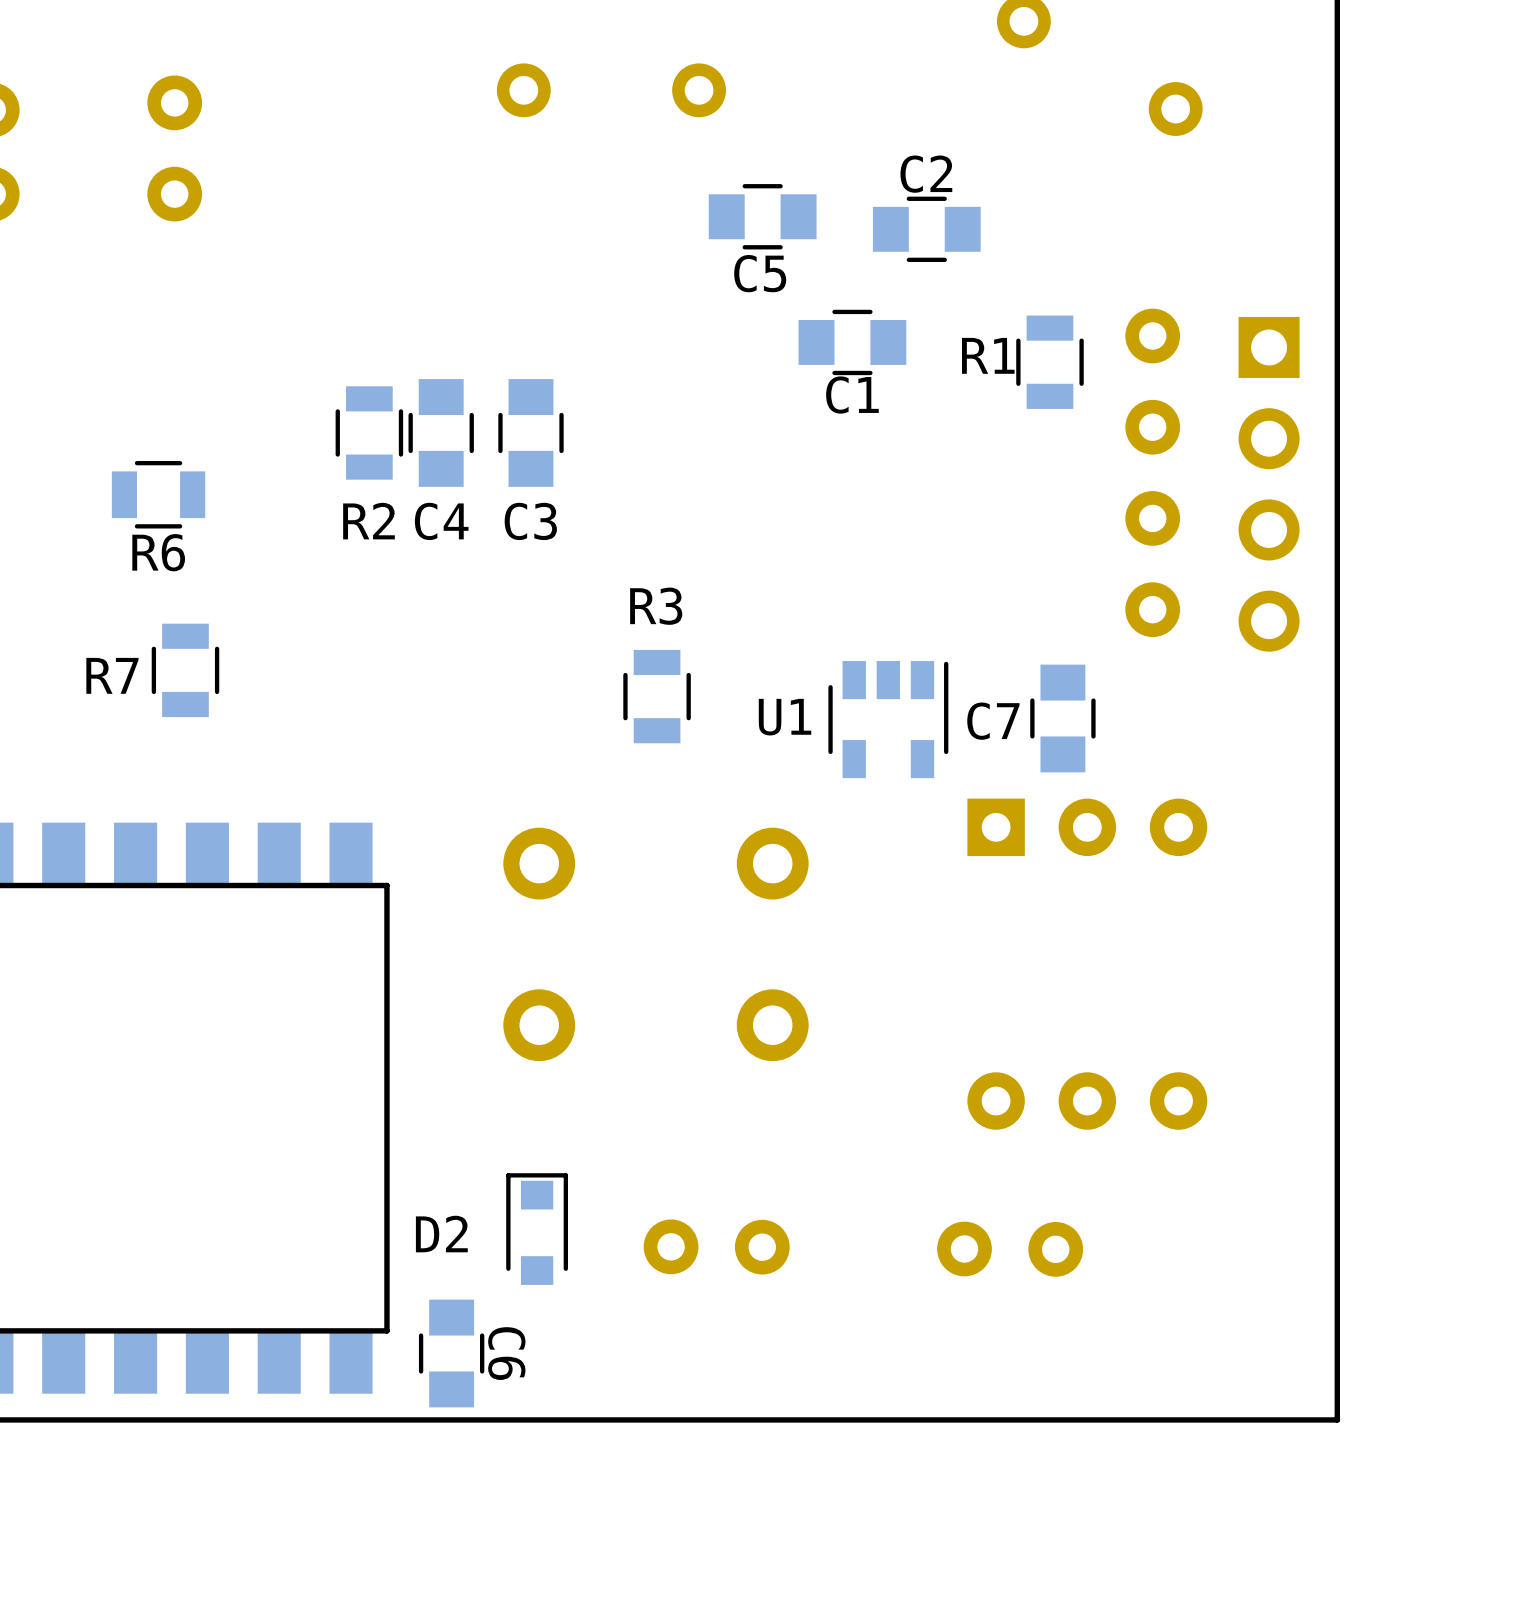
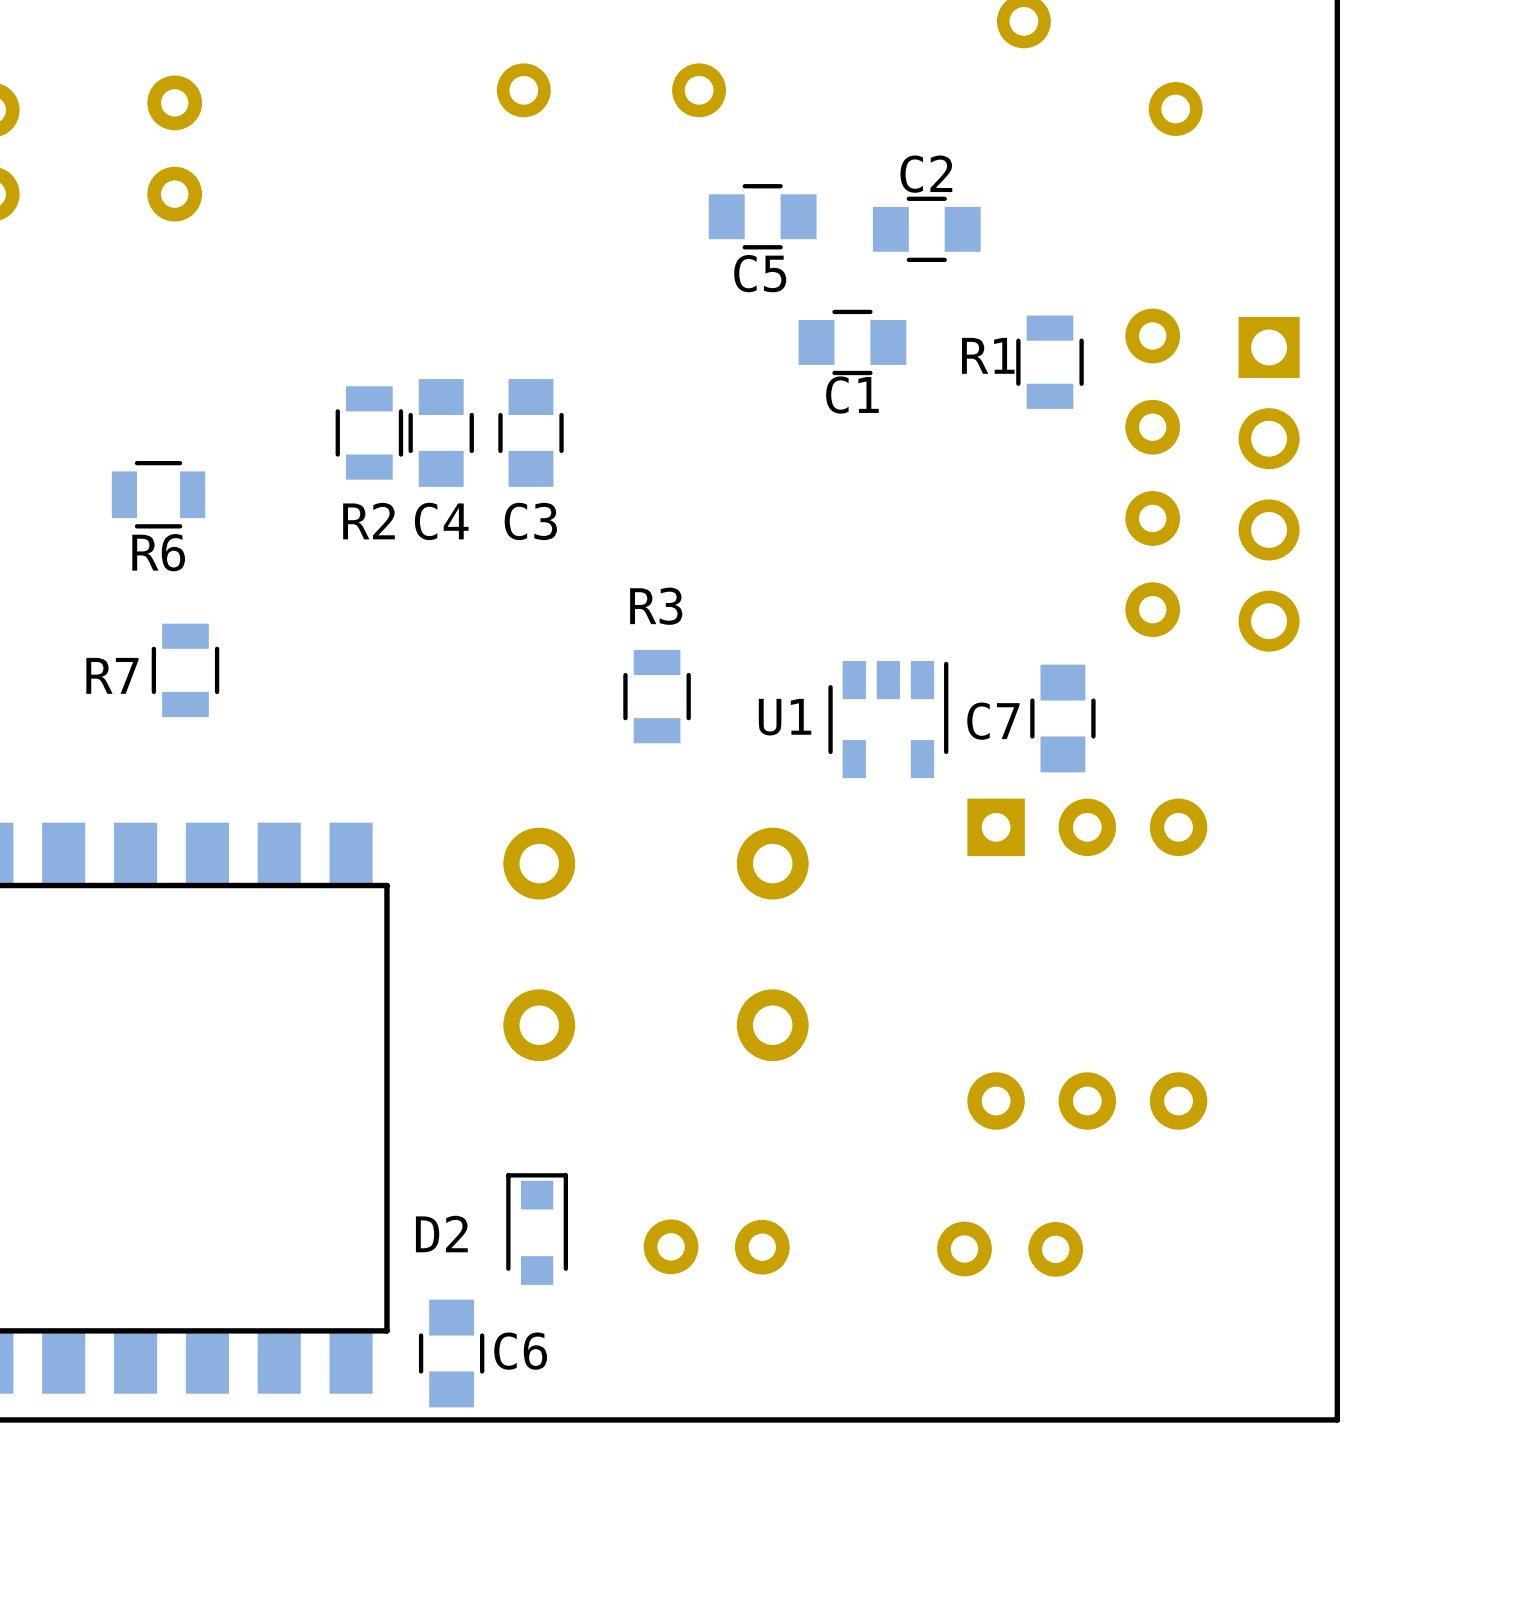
C6 name rotation: 0° (506, 1353) -> 90° counterclockwise (520, 1351)

